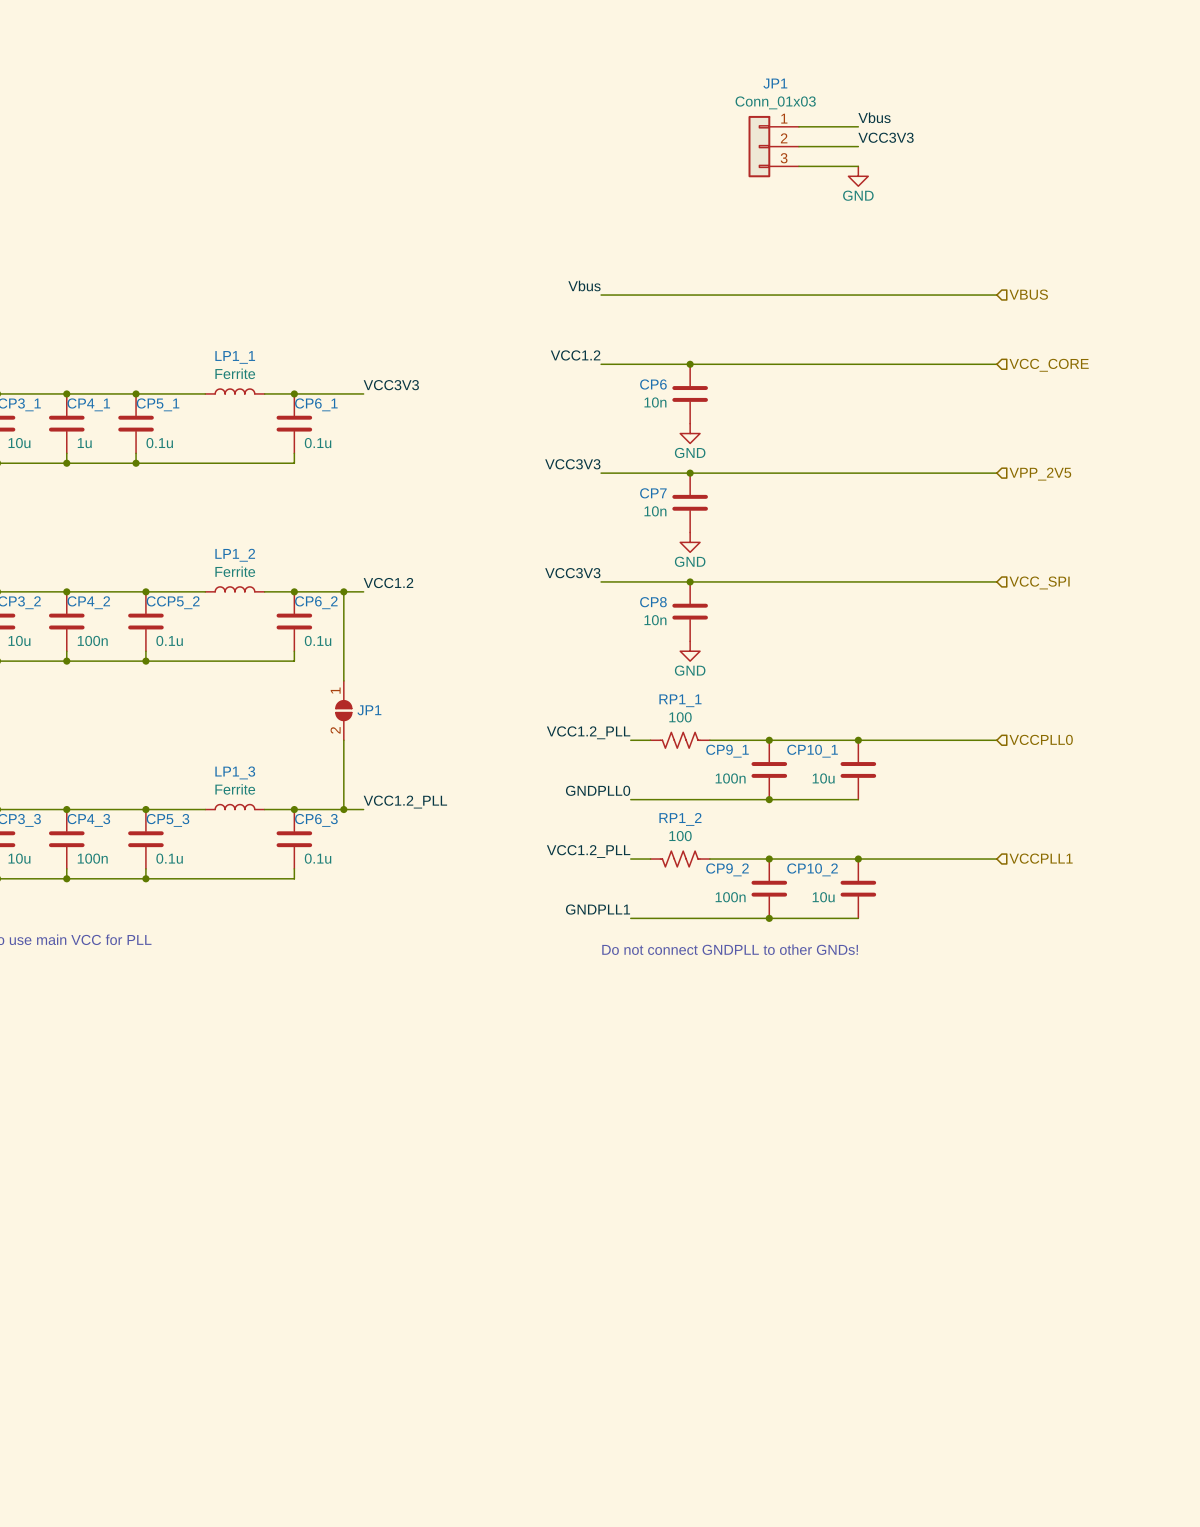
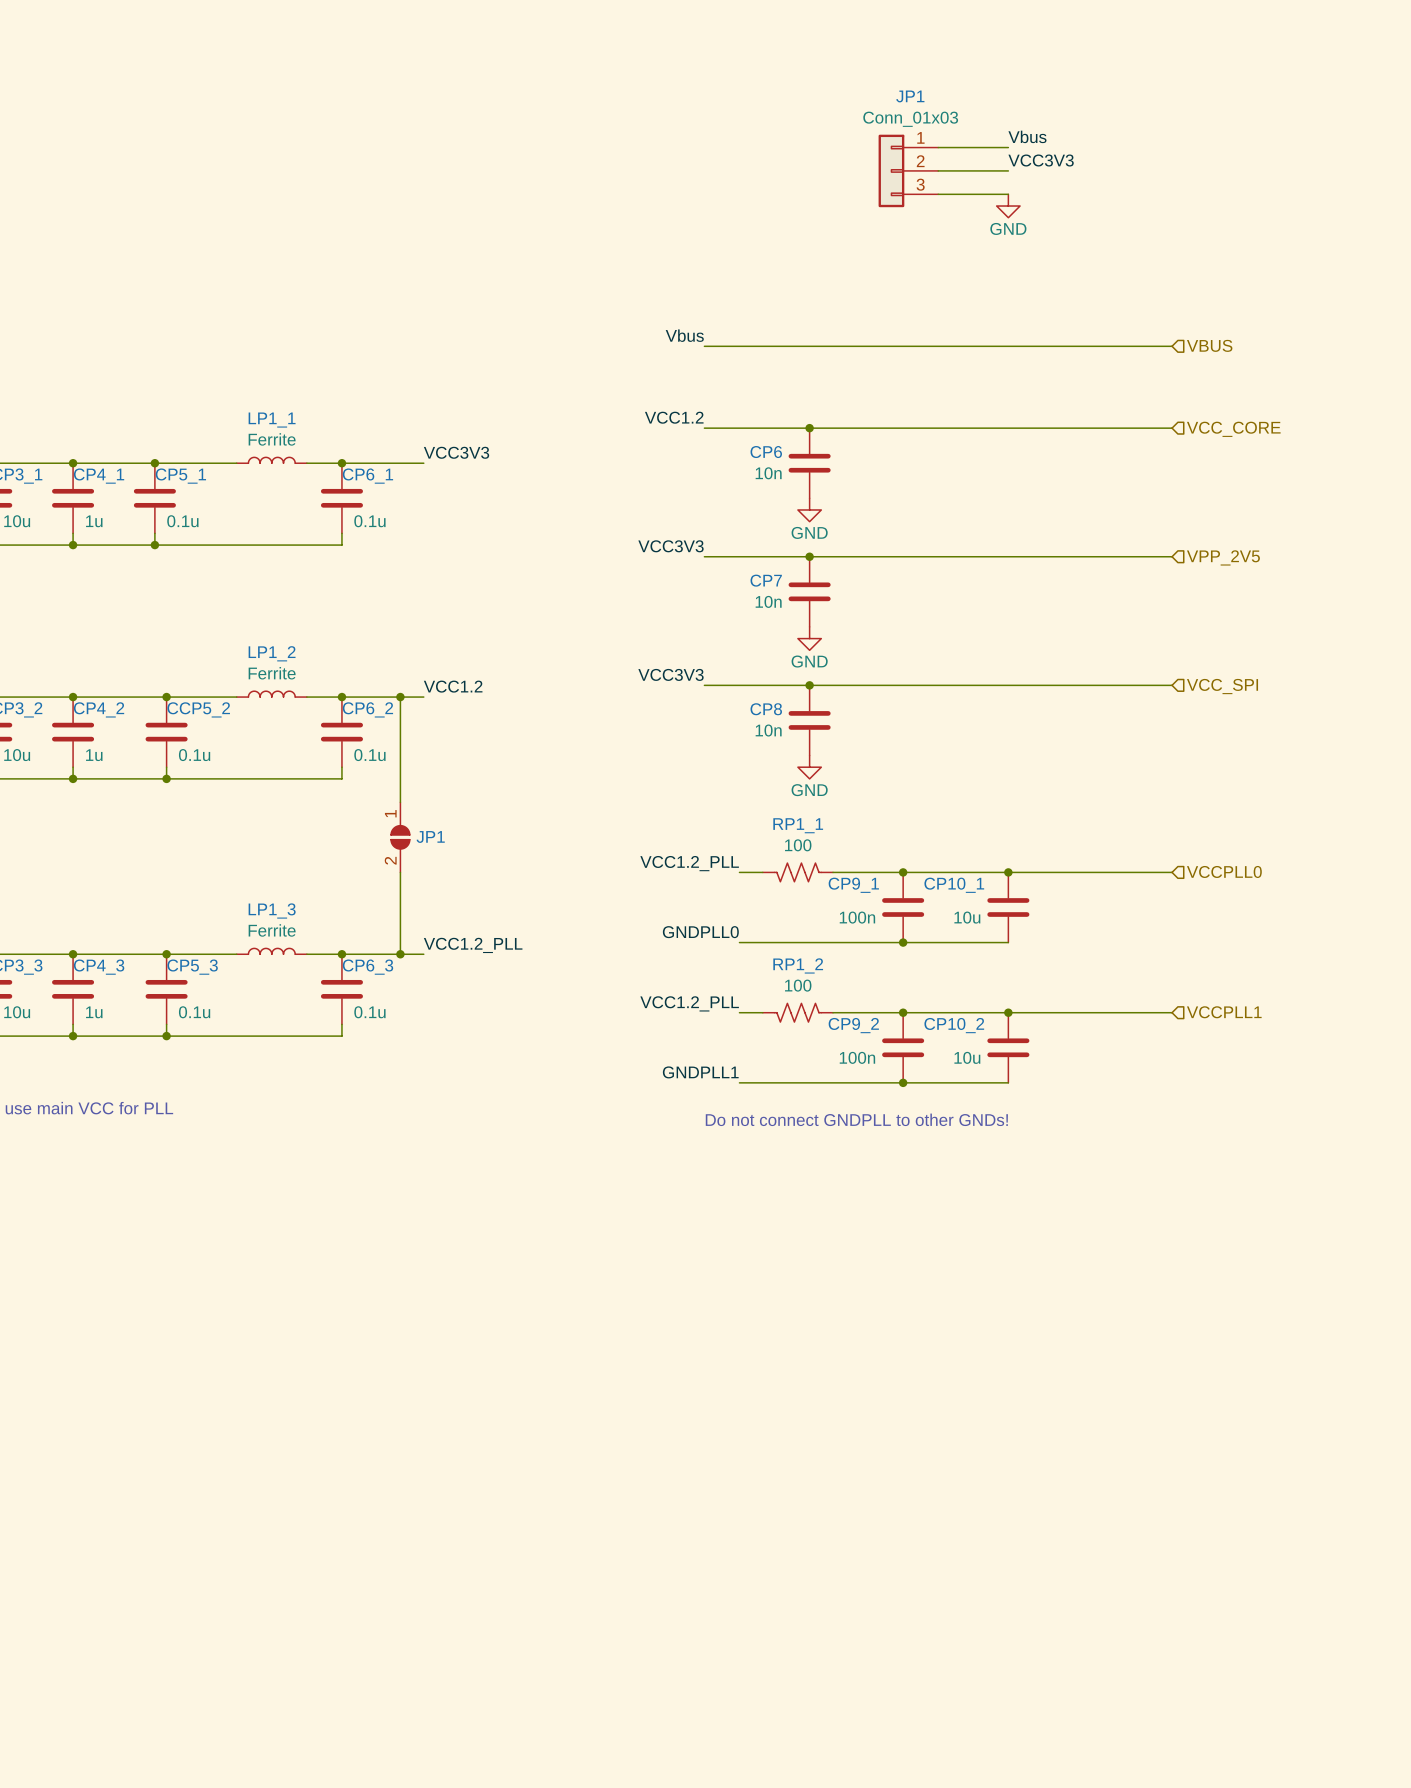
CP4_2 value: 100n (92, 640) -> 1u (94, 755)
CP4_3 value: 100n (92, 858) -> 1u (94, 1012)

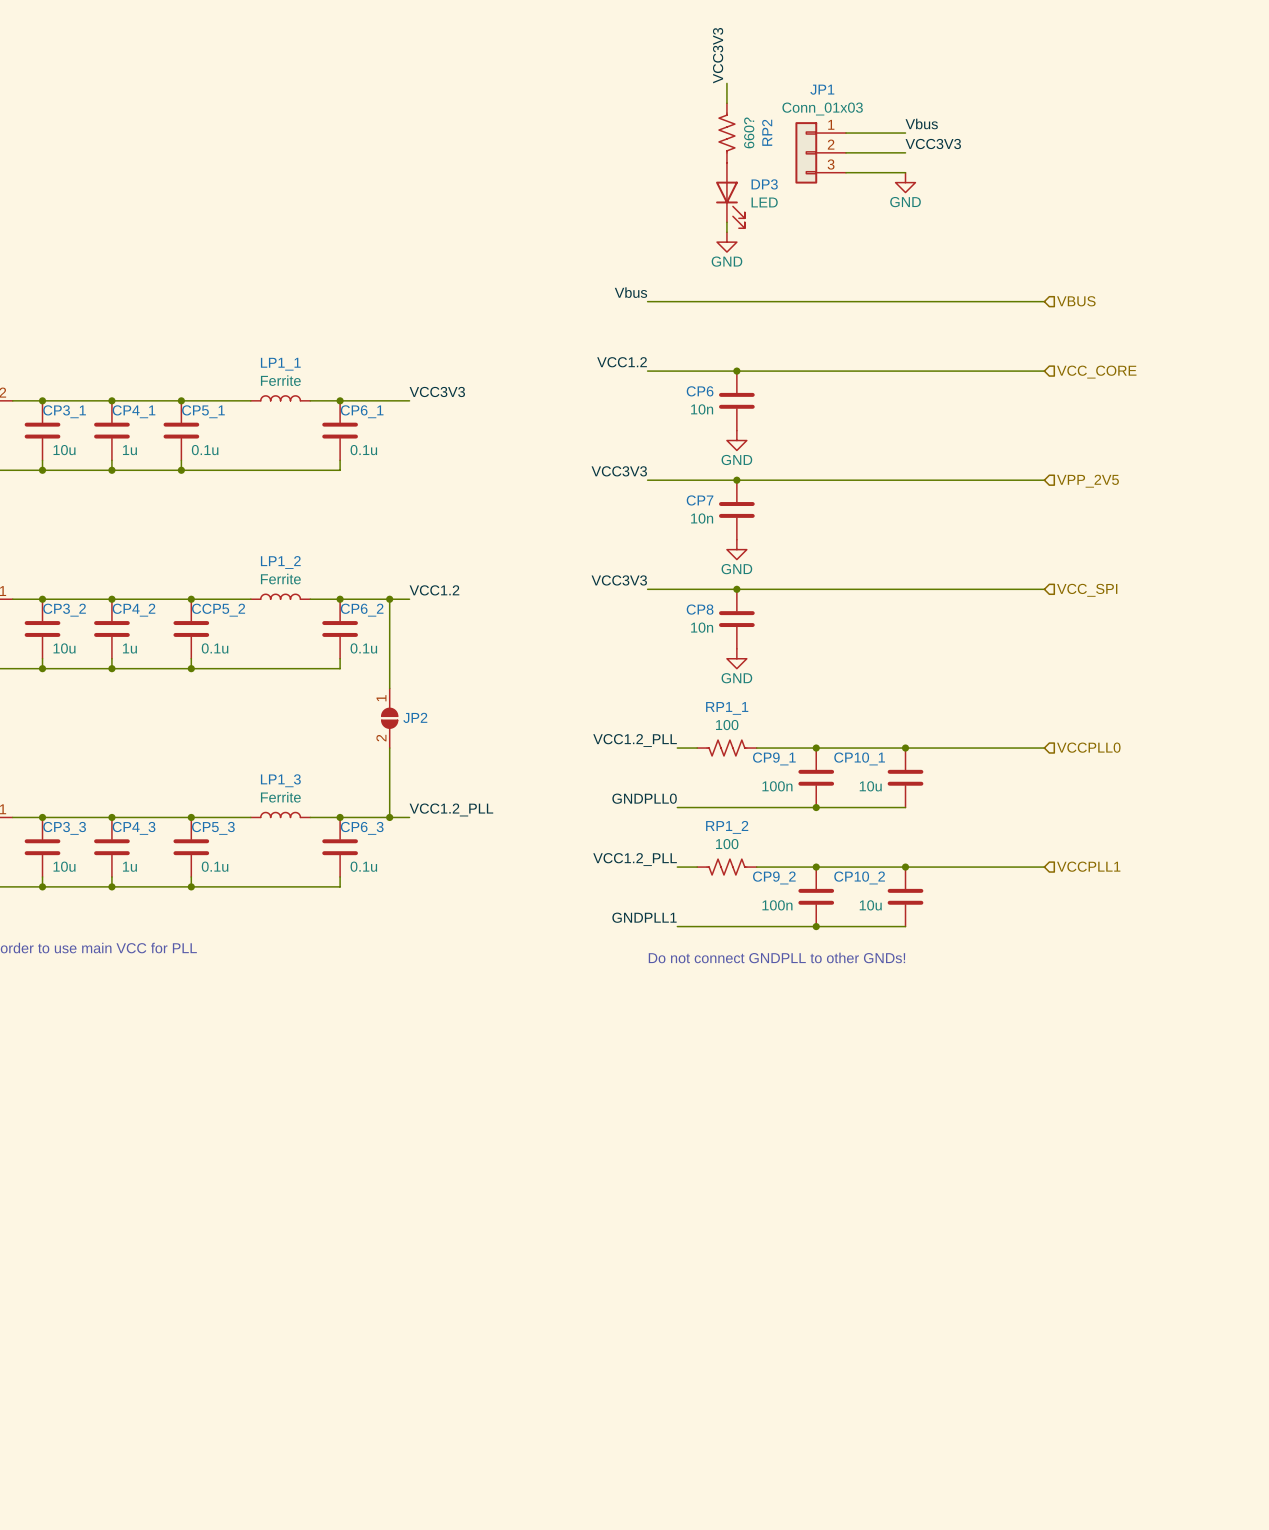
label: none -> VCC3V3 (718, 55)
wire: none -> (726, 83) (726, 103)
RP2: none -> 660? (726, 133)
DP3: none -> LED (730, 195)
wire: none -> (726, 222) (726, 232)
power symbol: none -> GND (726, 242)
JP1 name: JP1 (430, 836) -> JP2 (415, 717)

